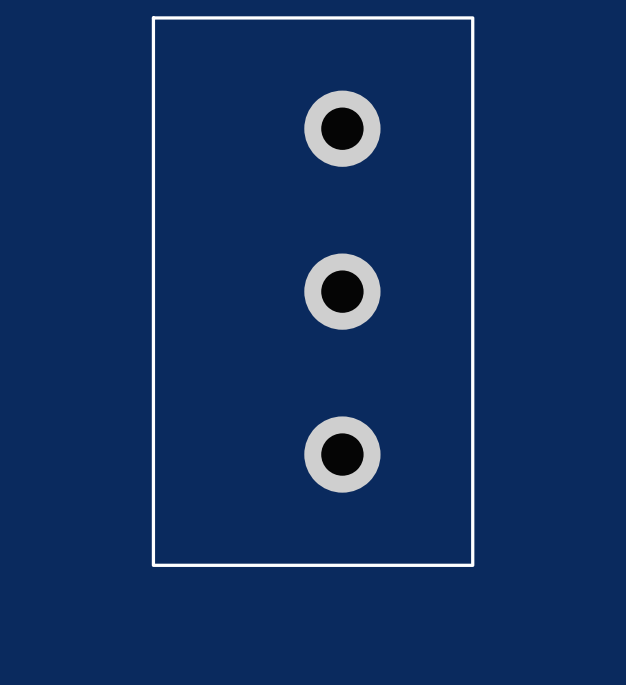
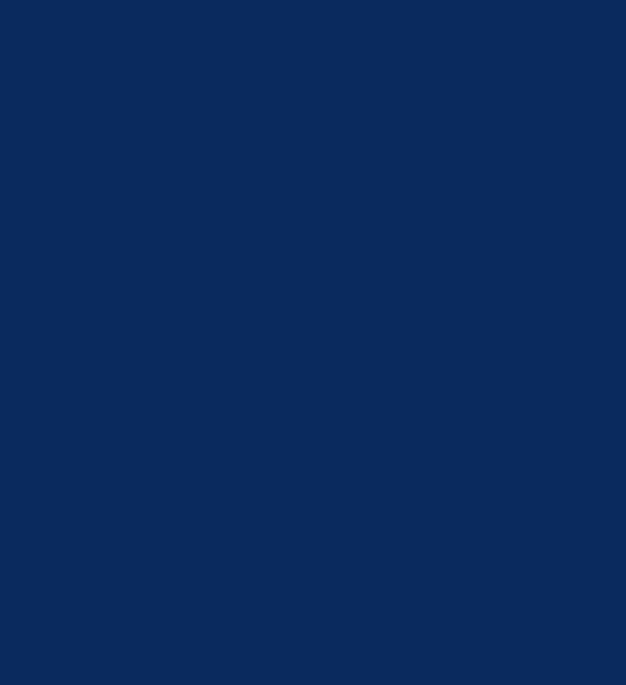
part: (313, 291) -> none

